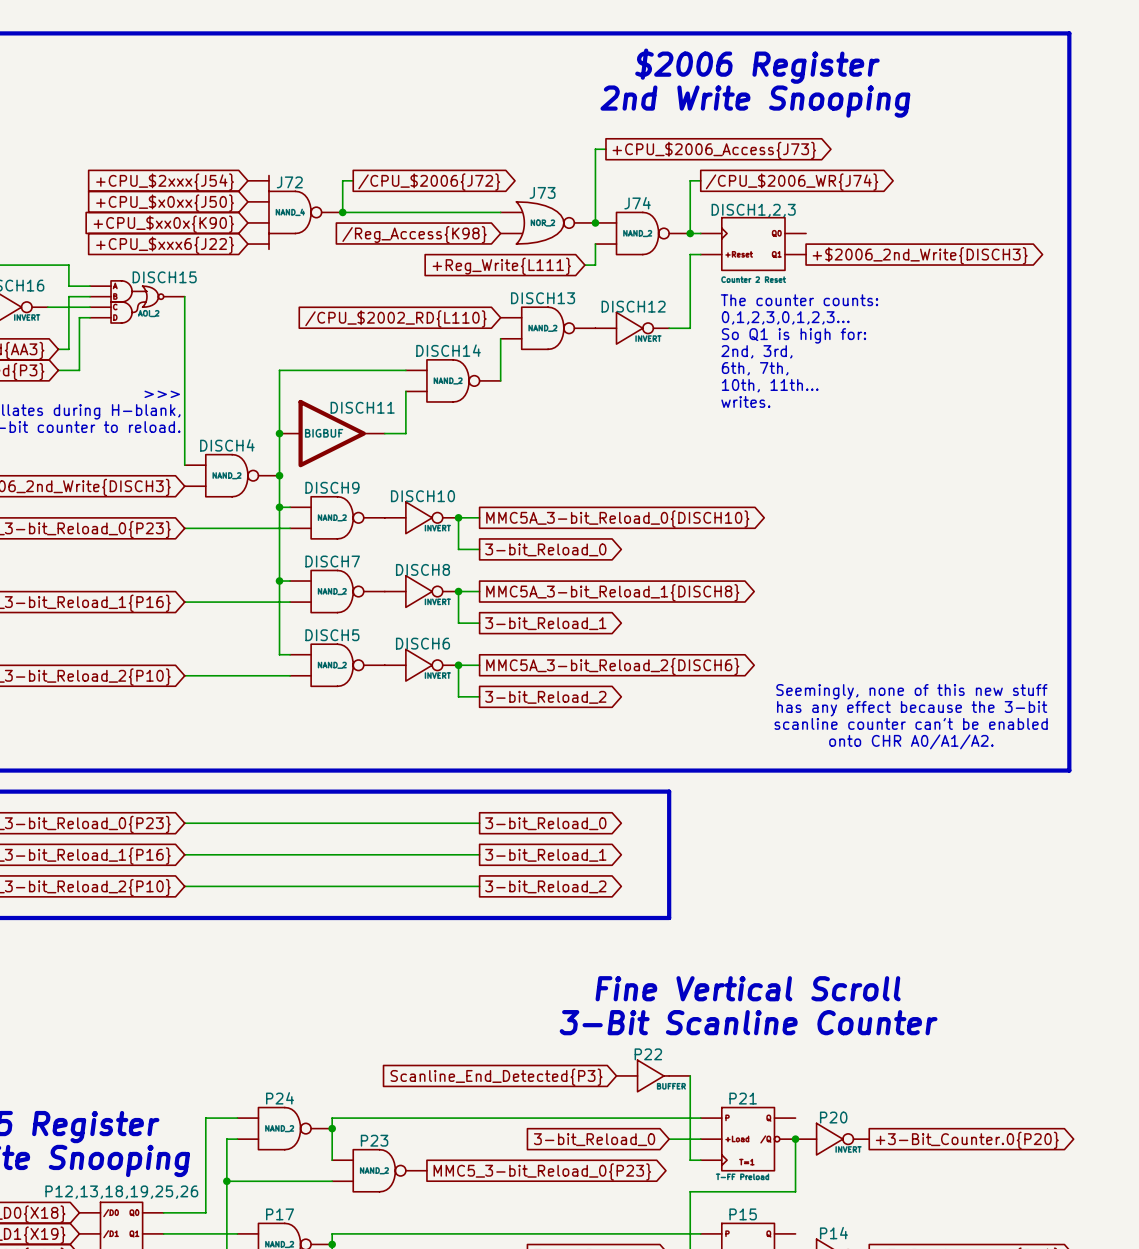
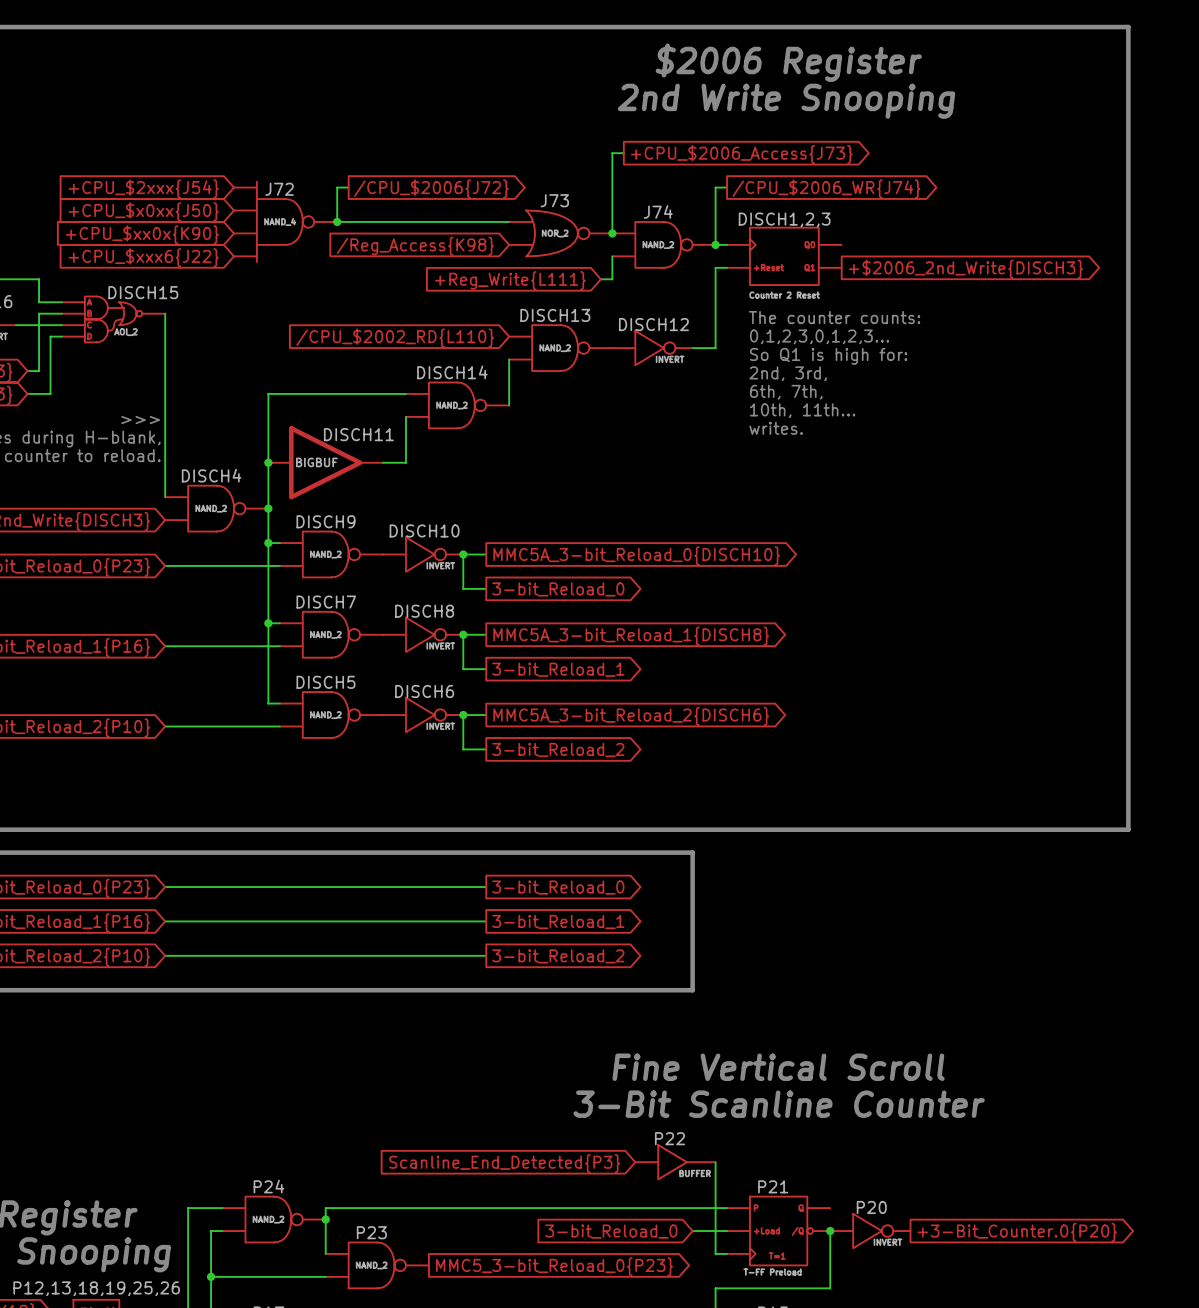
text: Seemingly, none of this new stuff (911, 691) -> none
text: has any effect because the 3-bit (912, 708) -> none
text: scanline counter can't be enabled (911, 723) -> none
text: onto CHR A0/A1/A2. (911, 741) -> none

